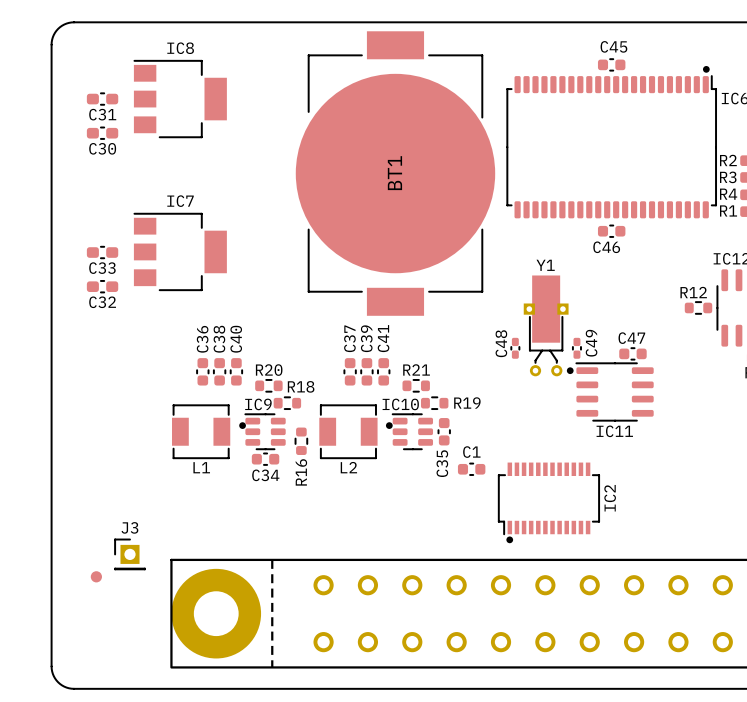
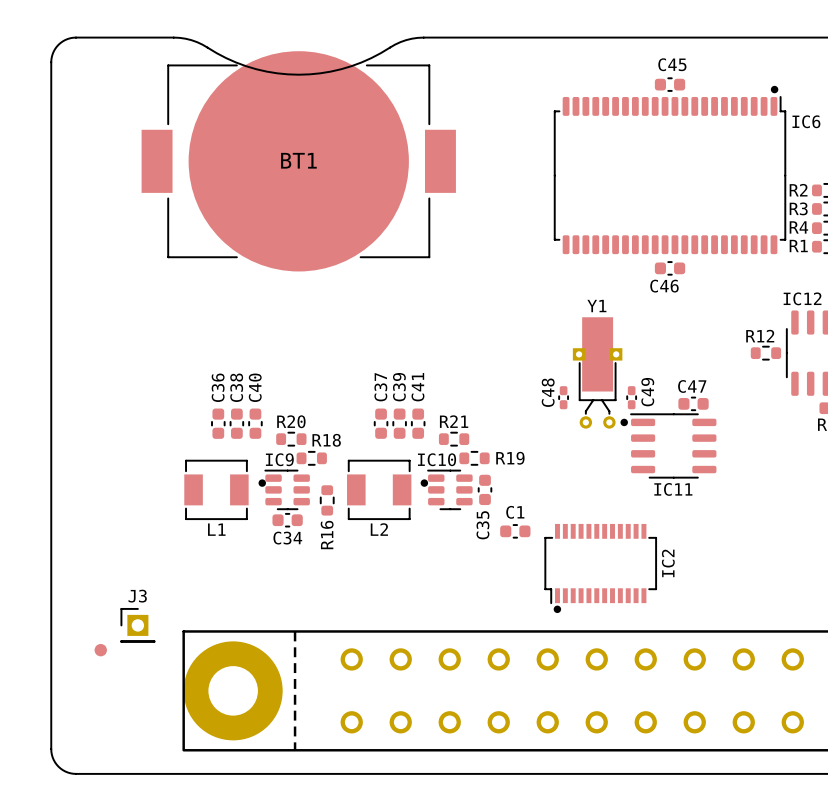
board edge: (162, 22) (388, 22) -> (173, 37) (197, 42) (226, 58) (246, 66) (266, 71) (298, 74) (320, 73) (351, 66) (371, 58) (400, 42) (423, 37)
C31: (102, 99) -> none
IC8: (180, 99) -> none
C30: (102, 133) -> none
BT1 rotation: 0° (395, 173) -> 90° clockwise (298, 161)
IC7: (180, 251) -> none
C33: (102, 252) -> none
C32: (102, 286) -> none

